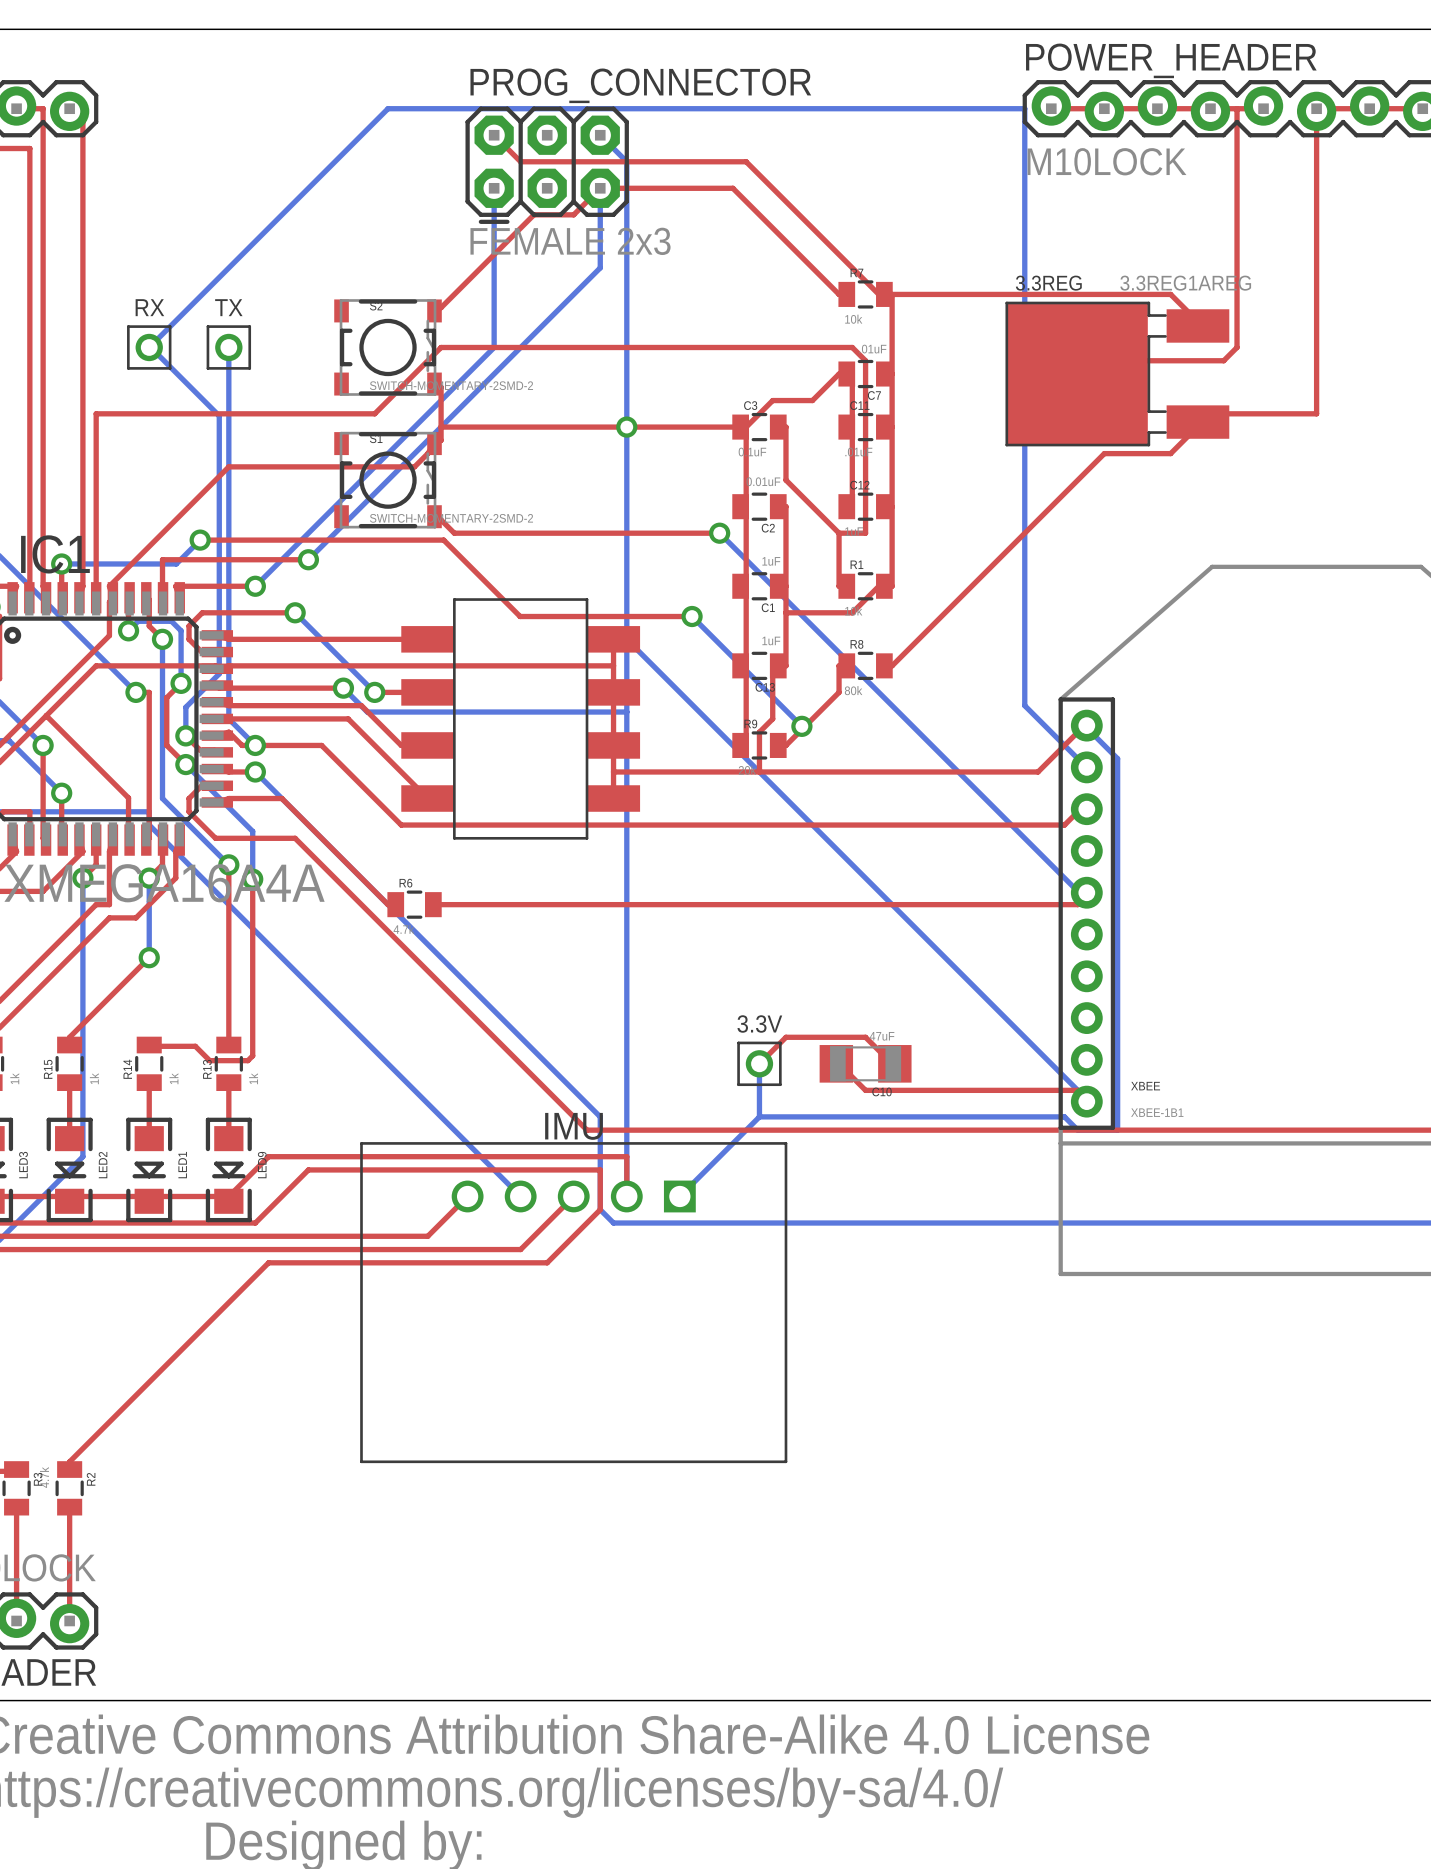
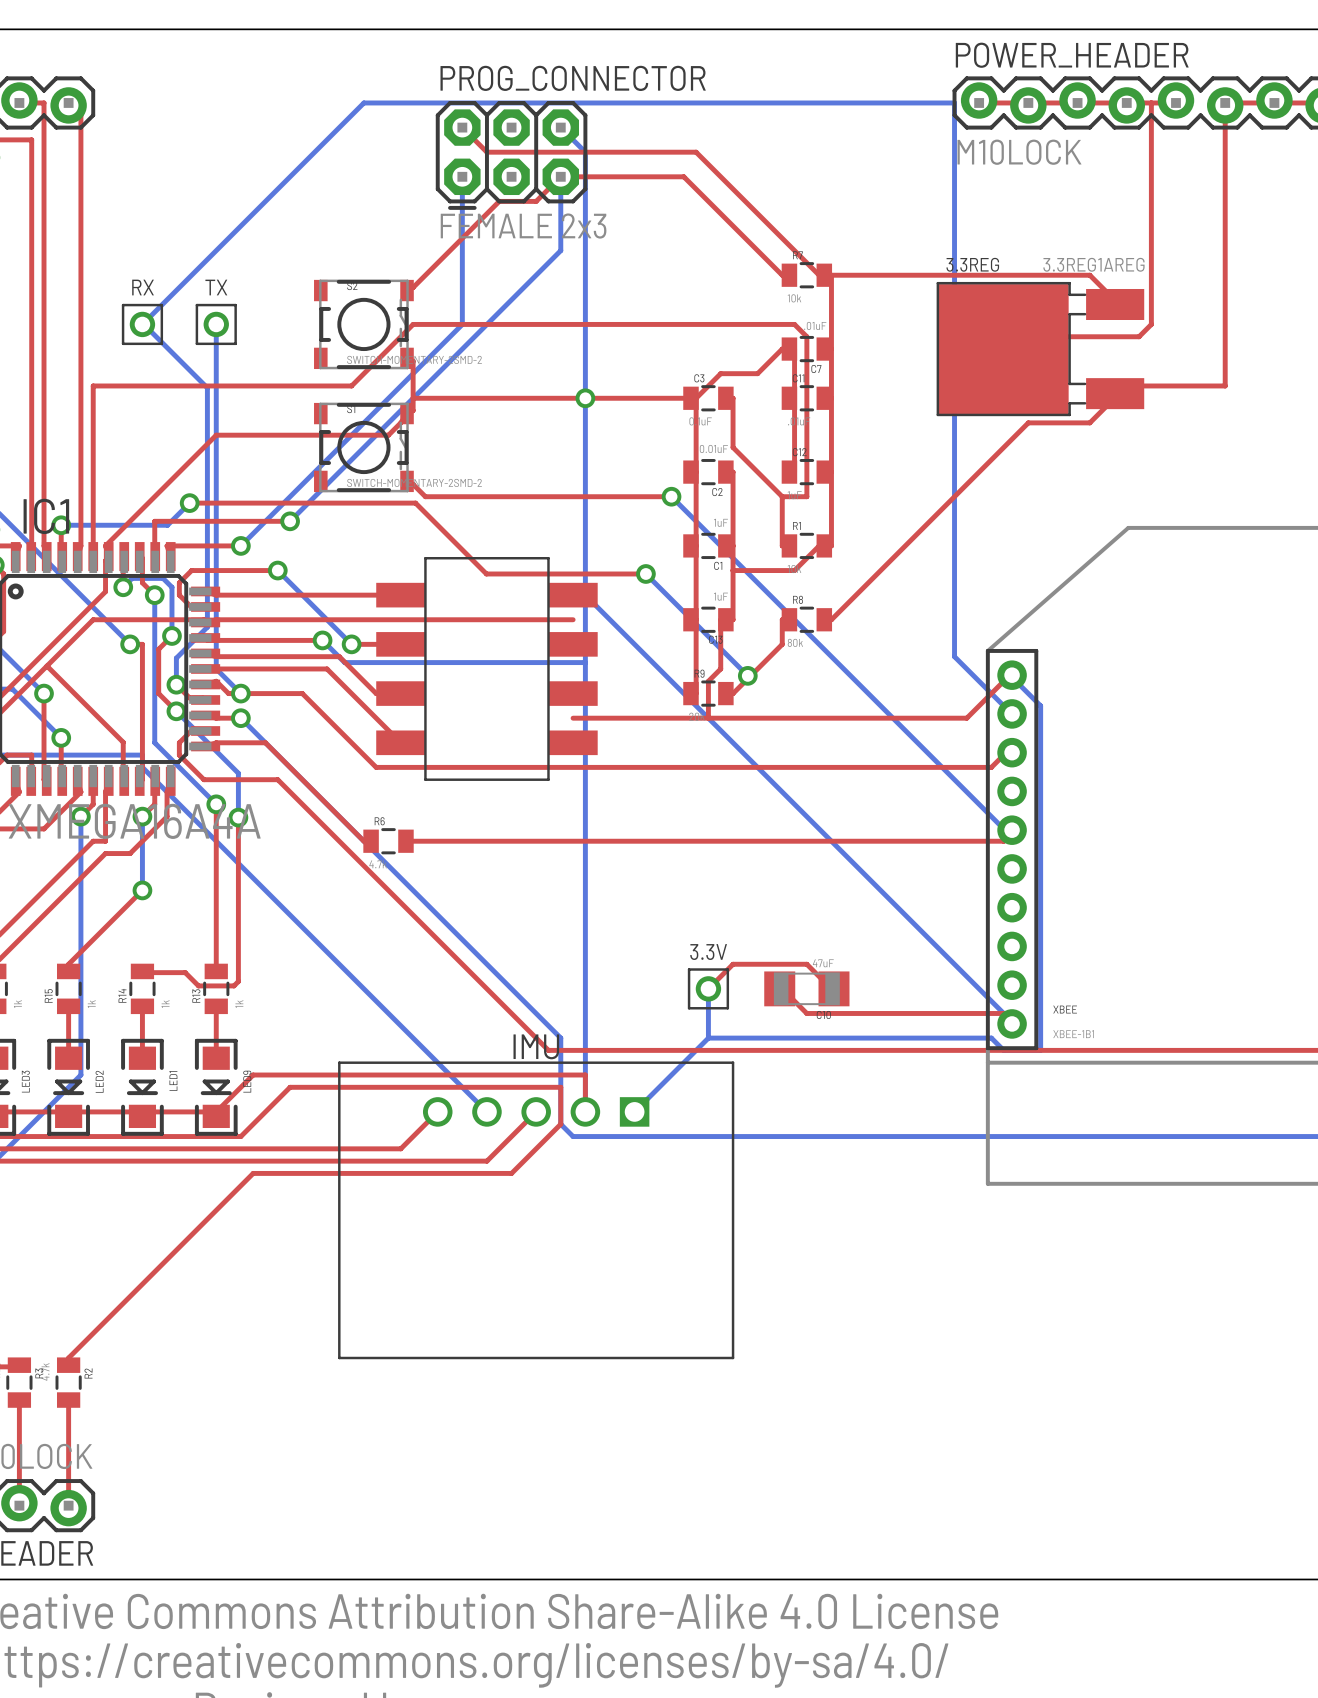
top track: (613, 639) (613, 798) -> none

